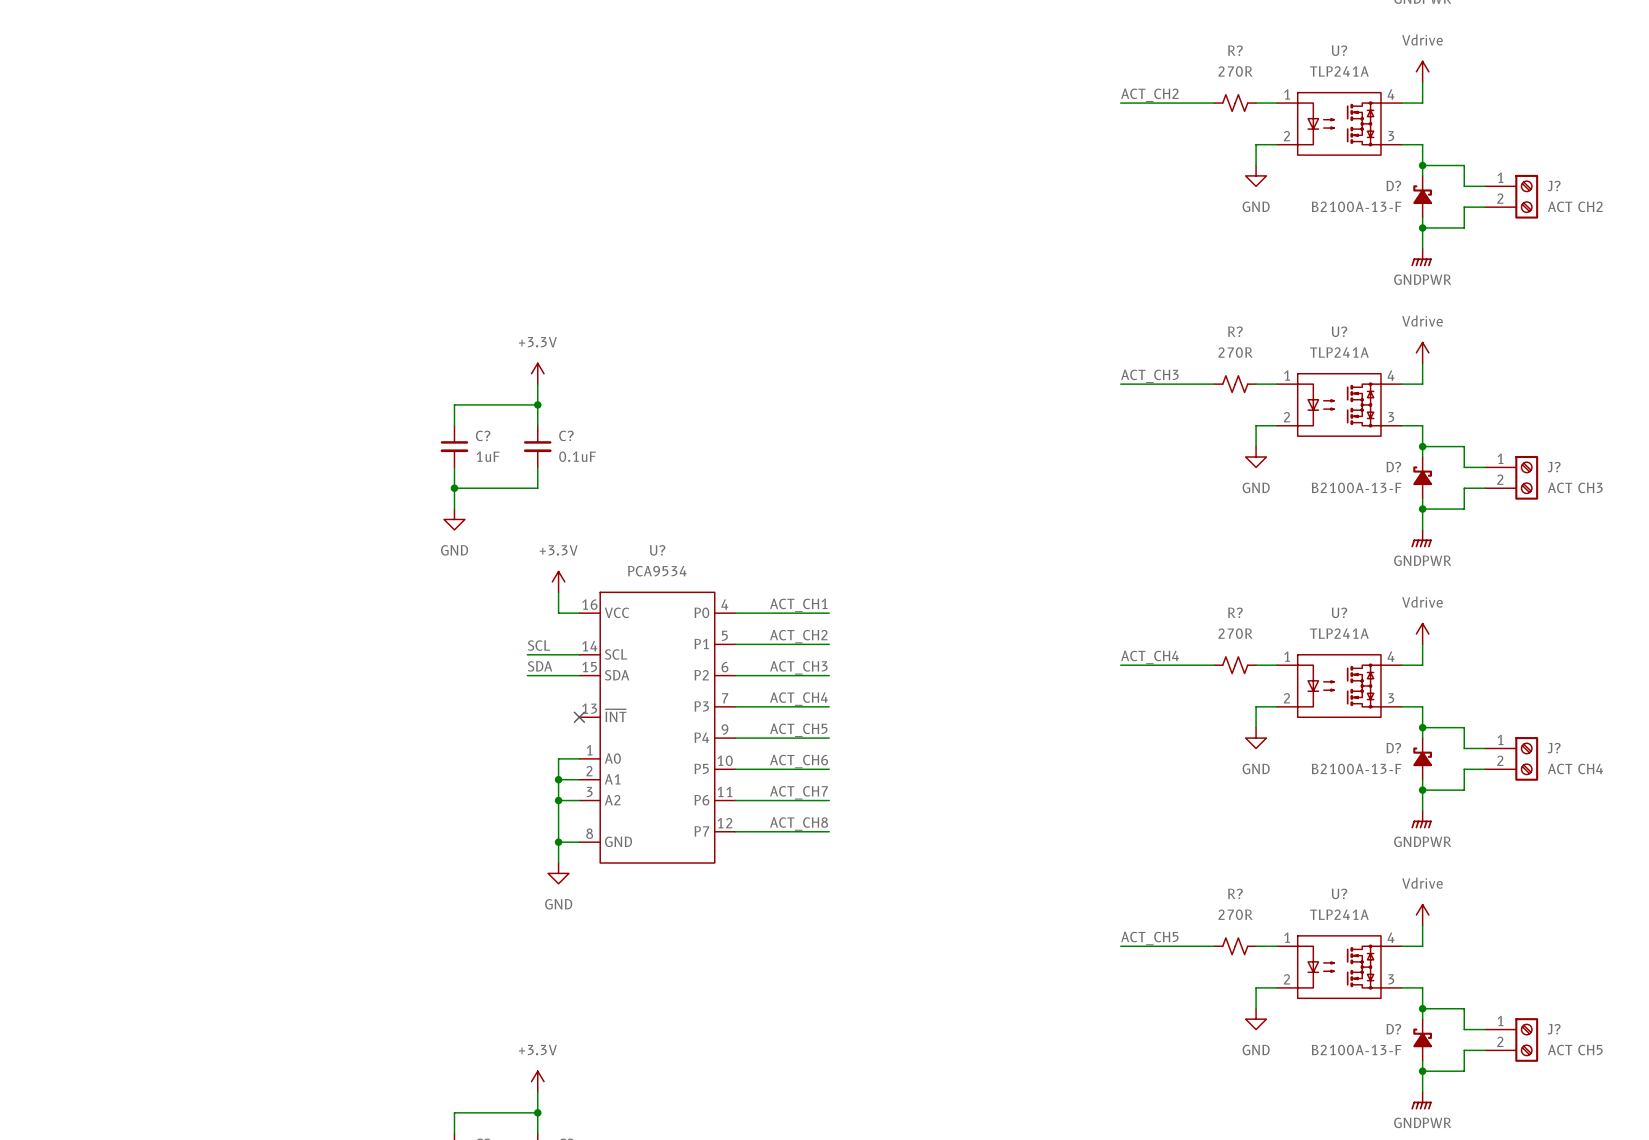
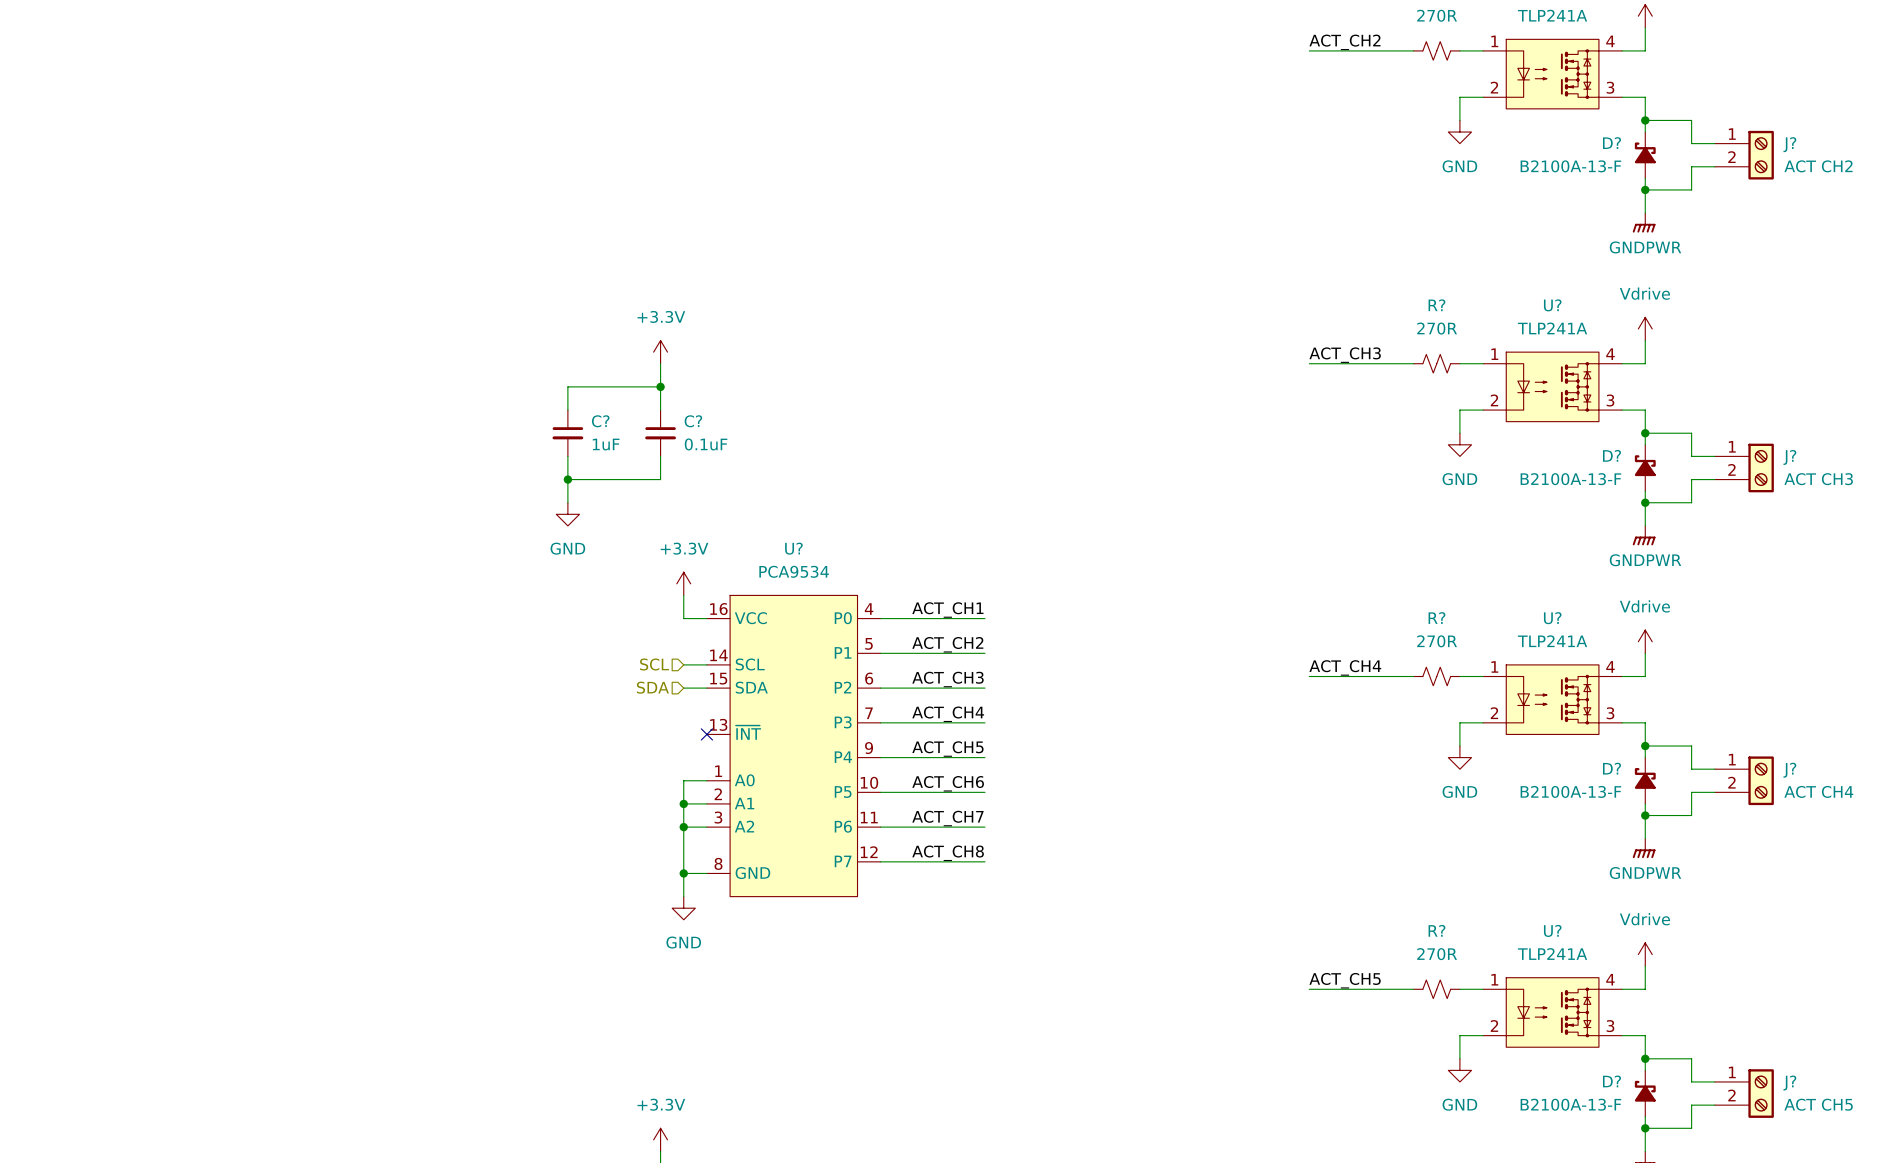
label: SCL (539, 645) -> none
wire: (527, 654) (558, 654) -> none
hierarchical label: none -> SCL (654, 664)
label: SDA (540, 666) -> none
wire: (527, 675) (558, 675) -> none
hierarchical label: none -> SDA (652, 687)

